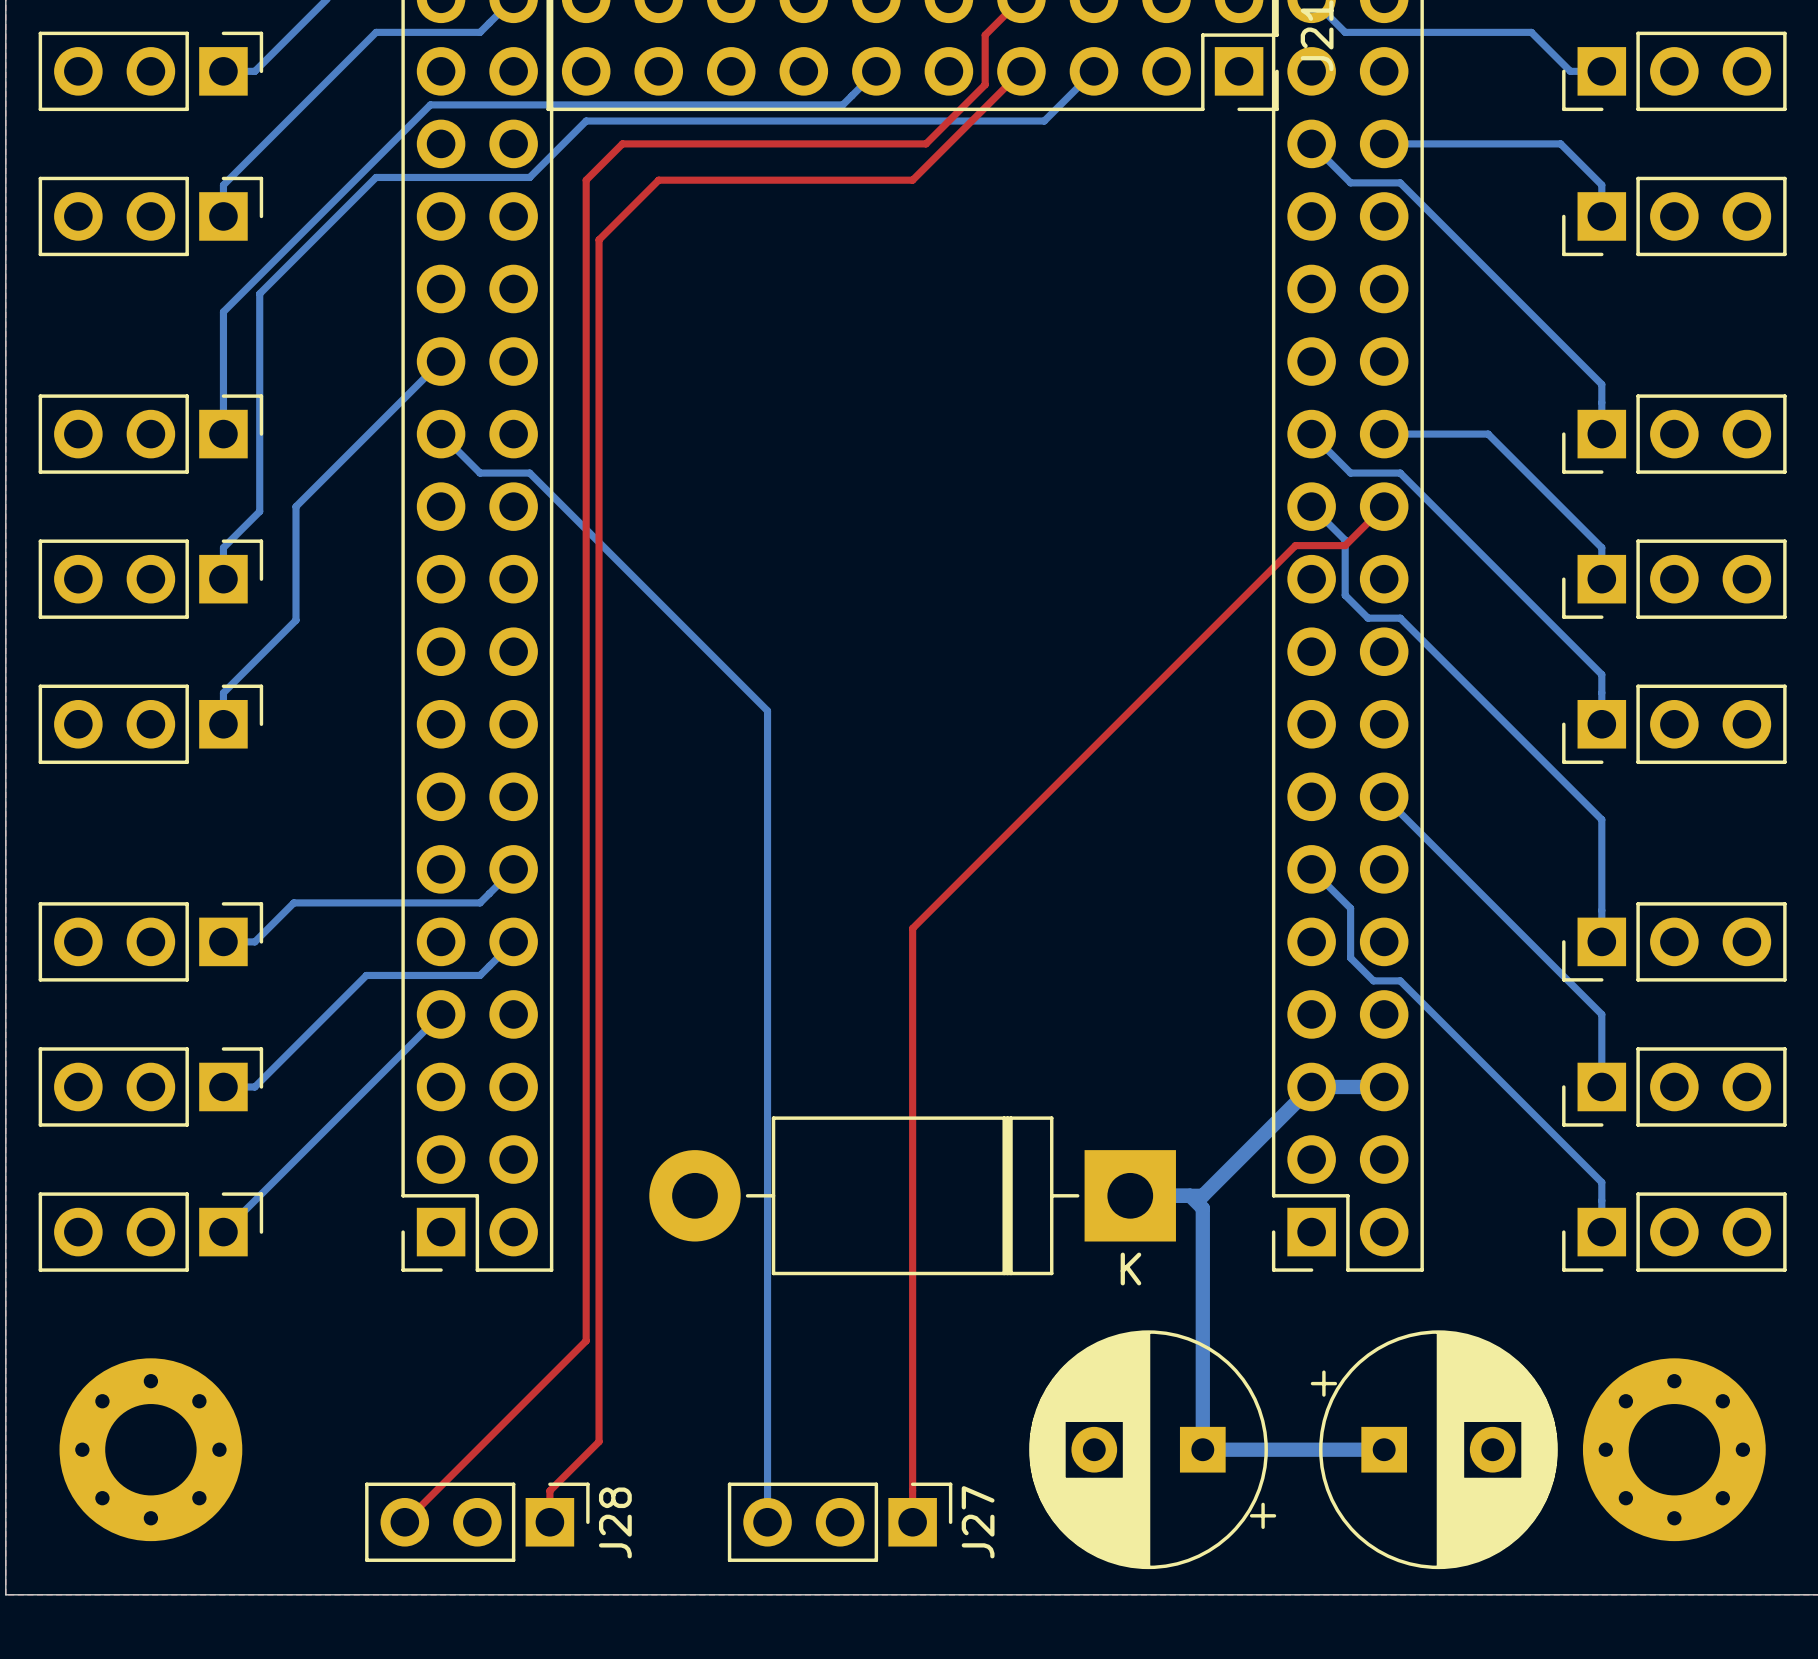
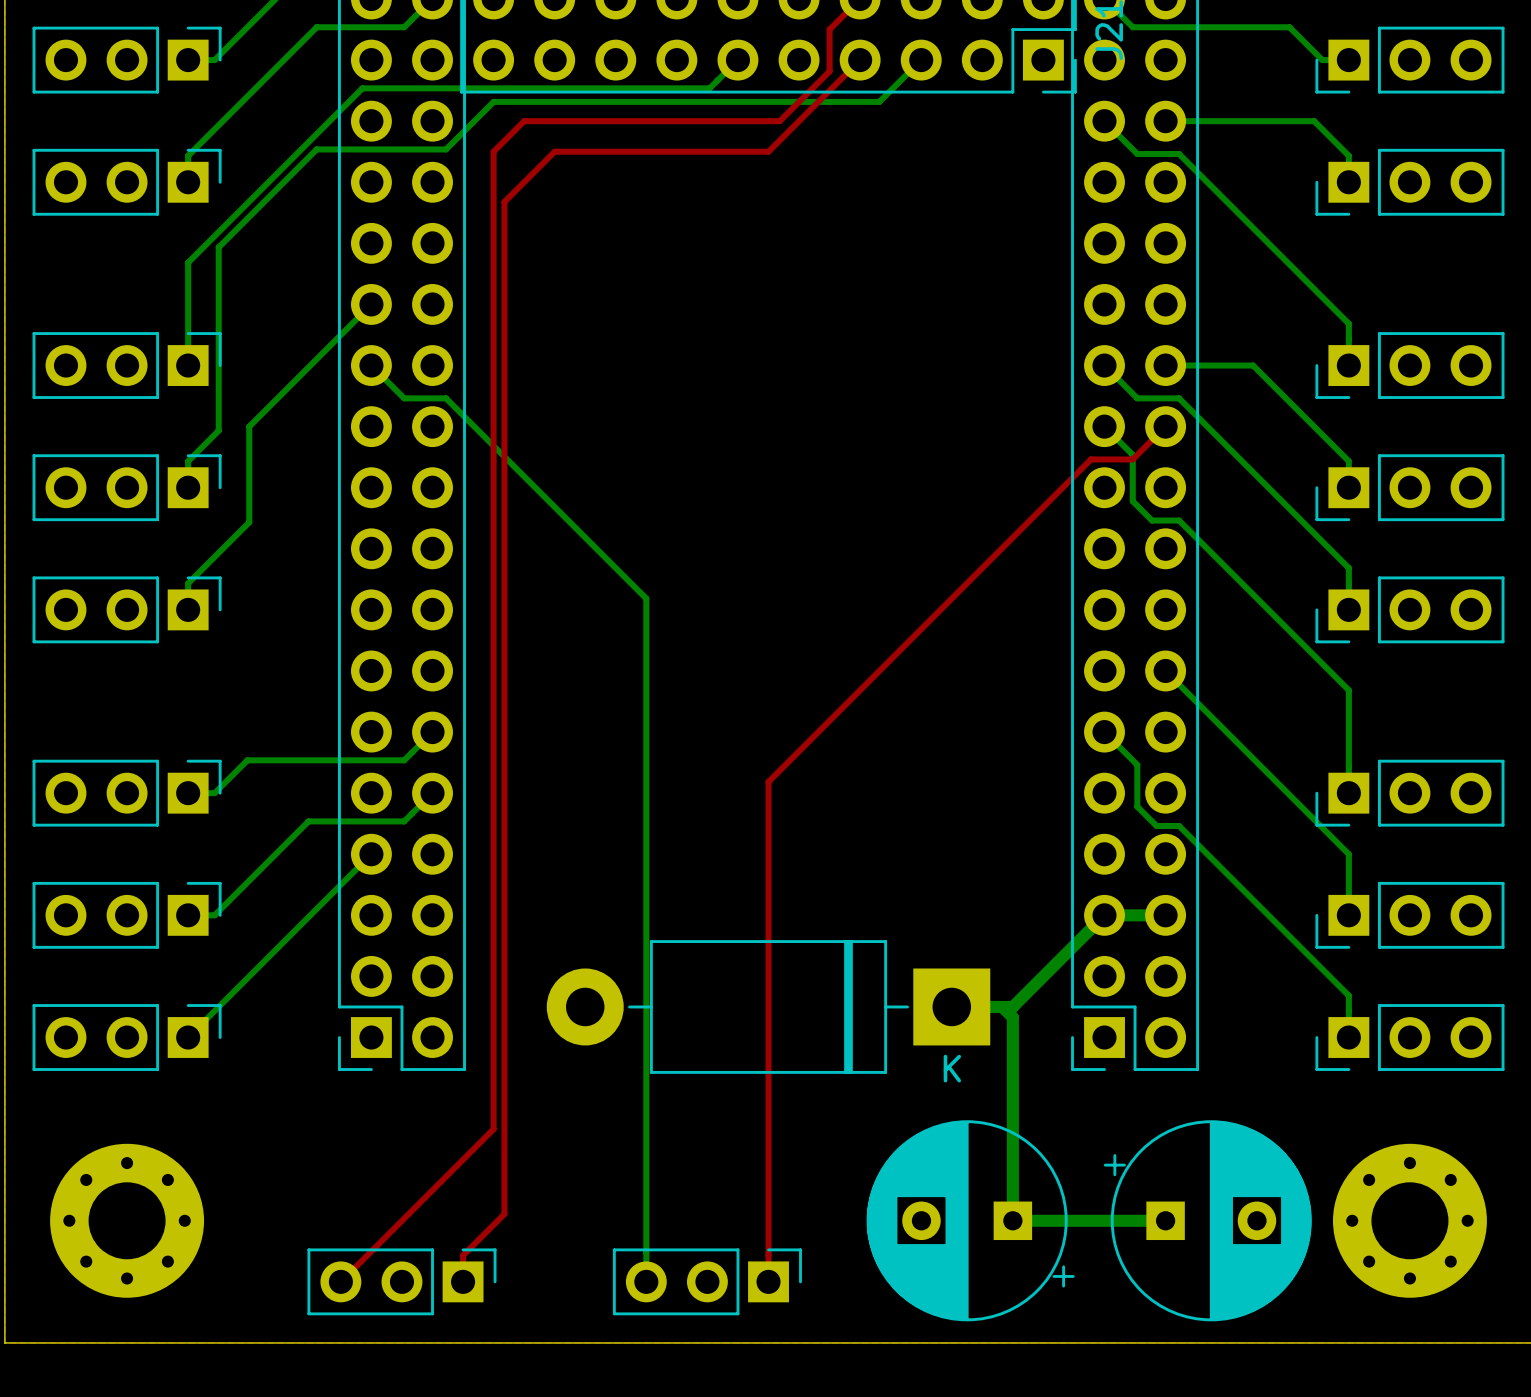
J28 name: J28 (615, 1522) -> none
J27 name: J27 (978, 1522) -> none

